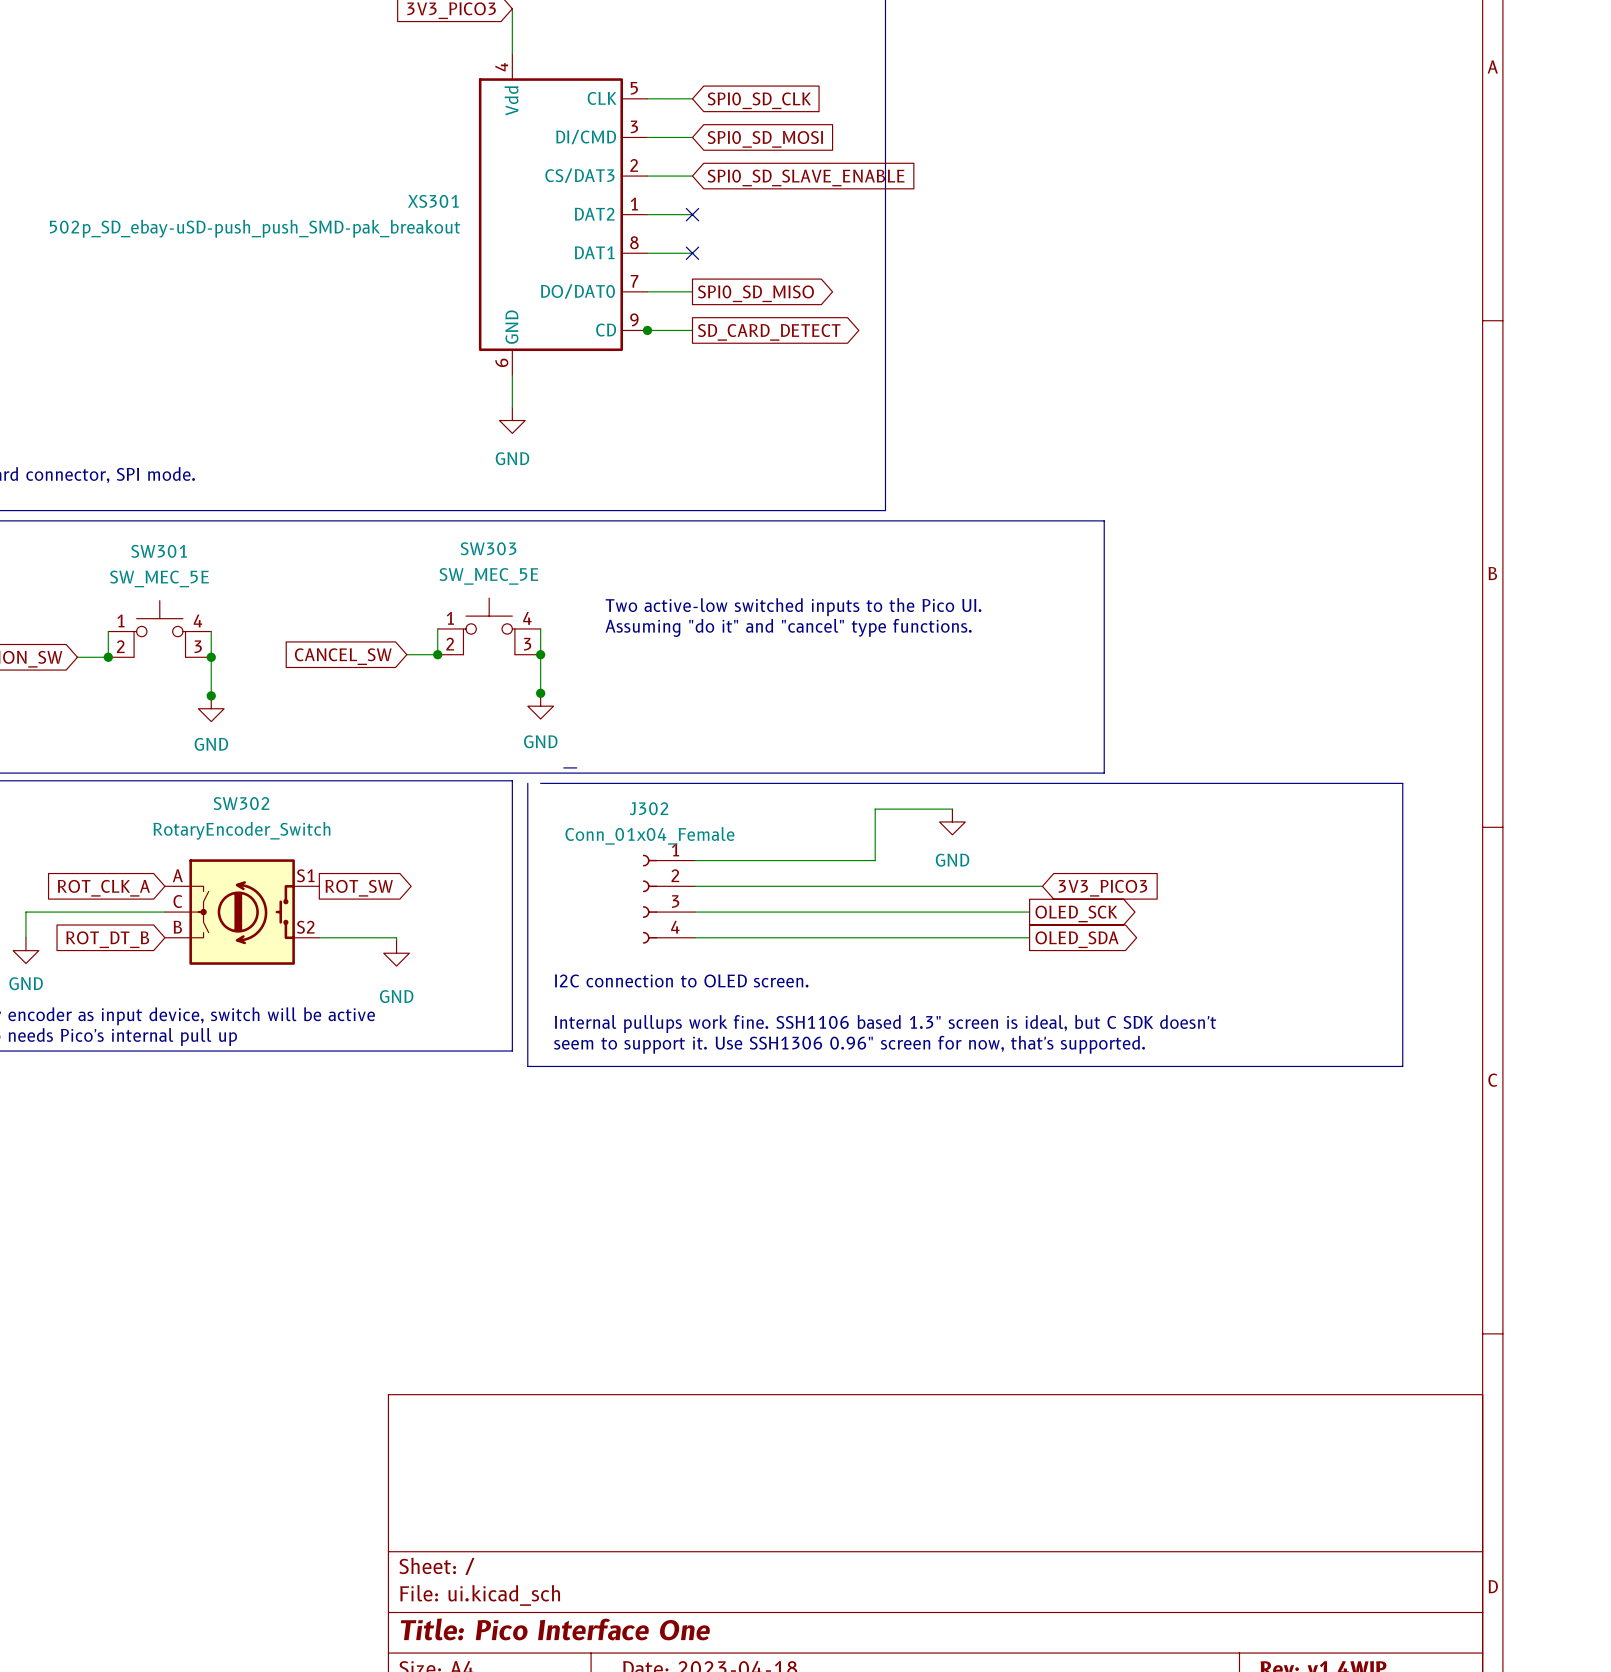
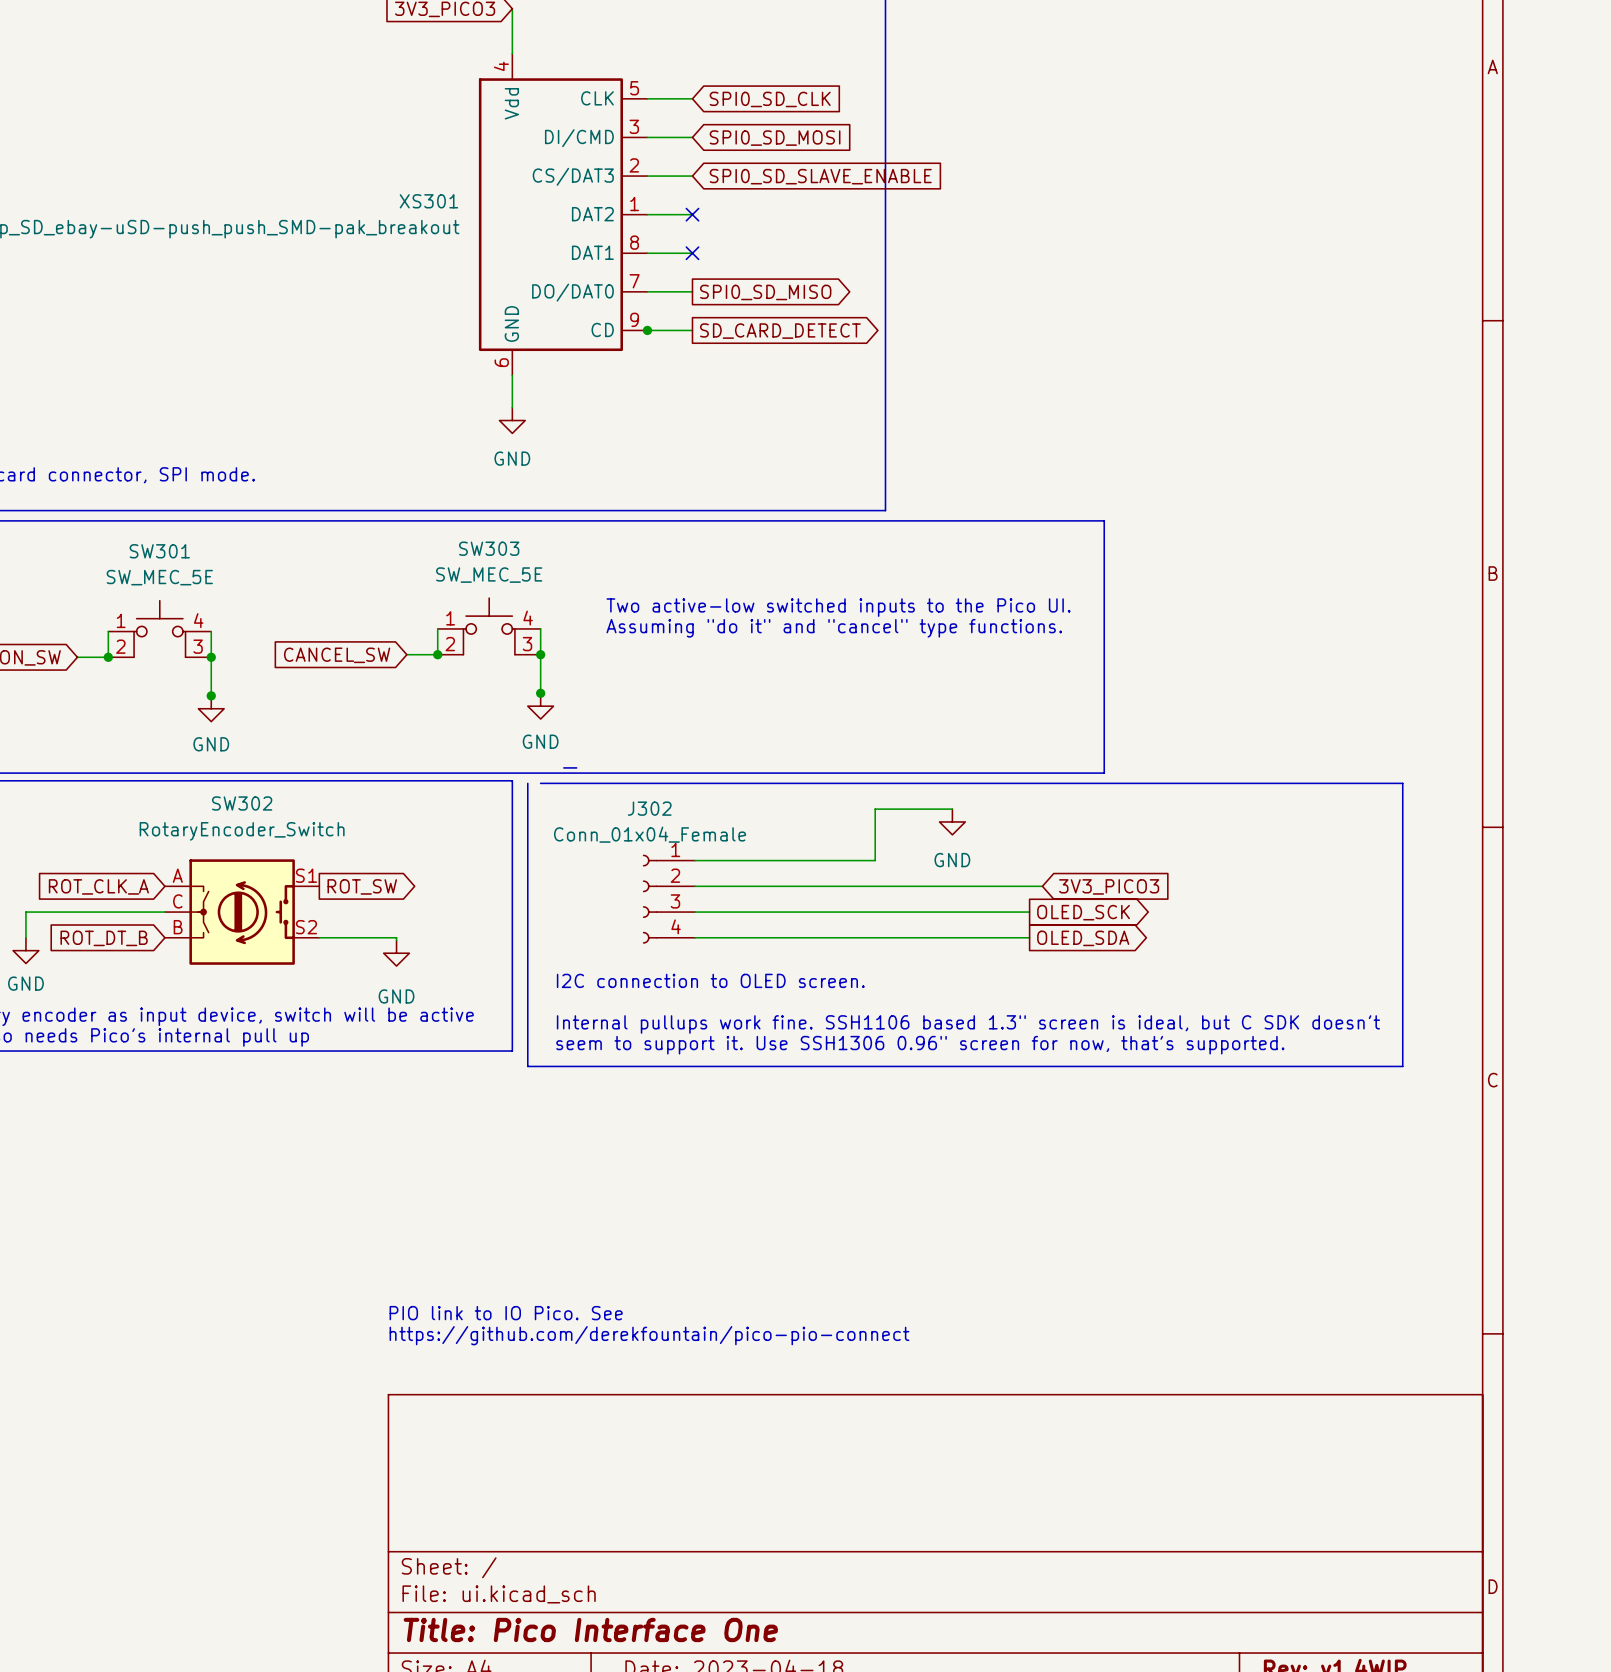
text: none -> PIO link to IO Pico. See (506, 1313)
text: none -> https://github.com/derekfountain/pico-pio-connect (649, 1335)

